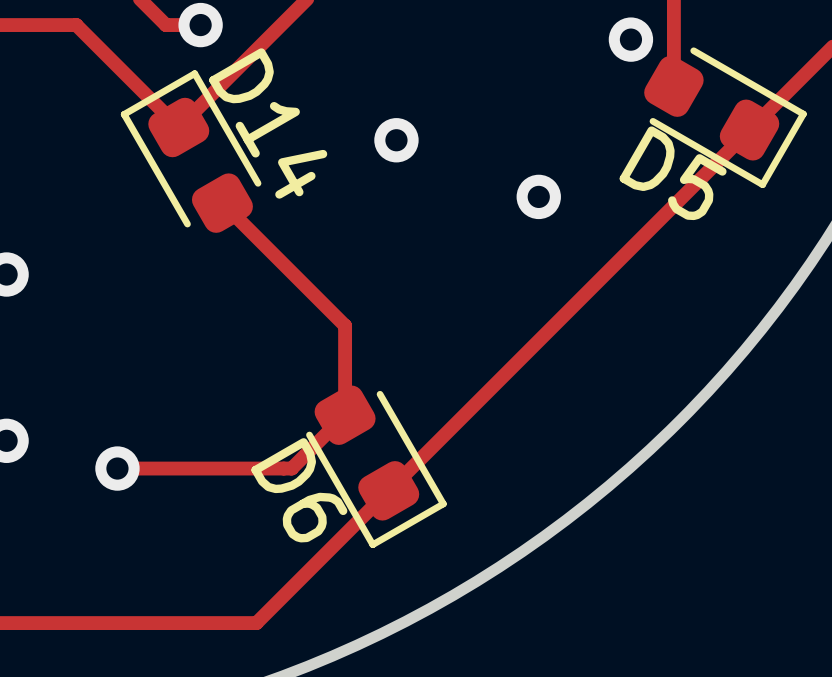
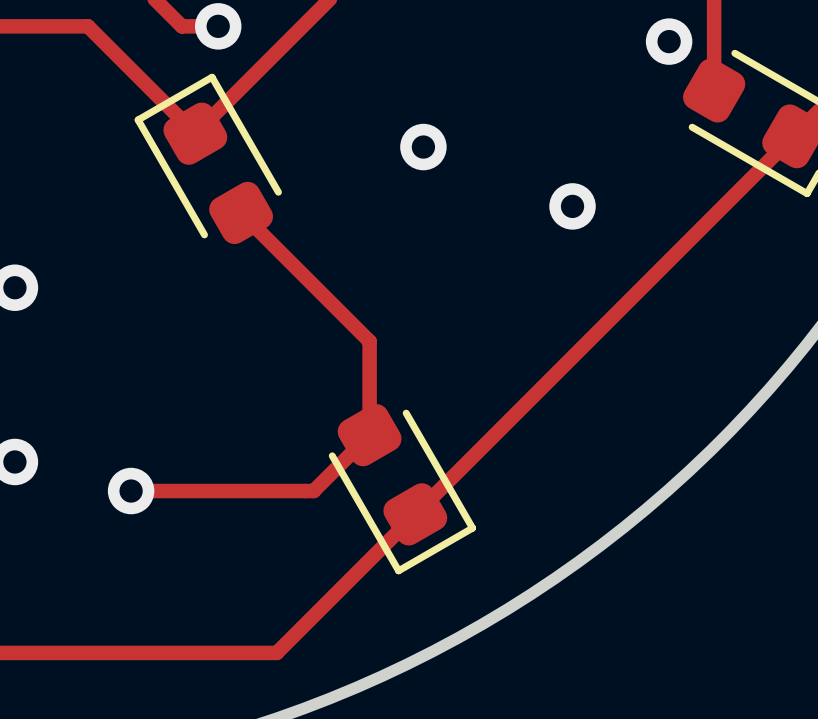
D14 name: D14 (268, 123) -> none
D5 name: D5 (673, 173) -> none
D6 name: D6 (299, 490) -> none

